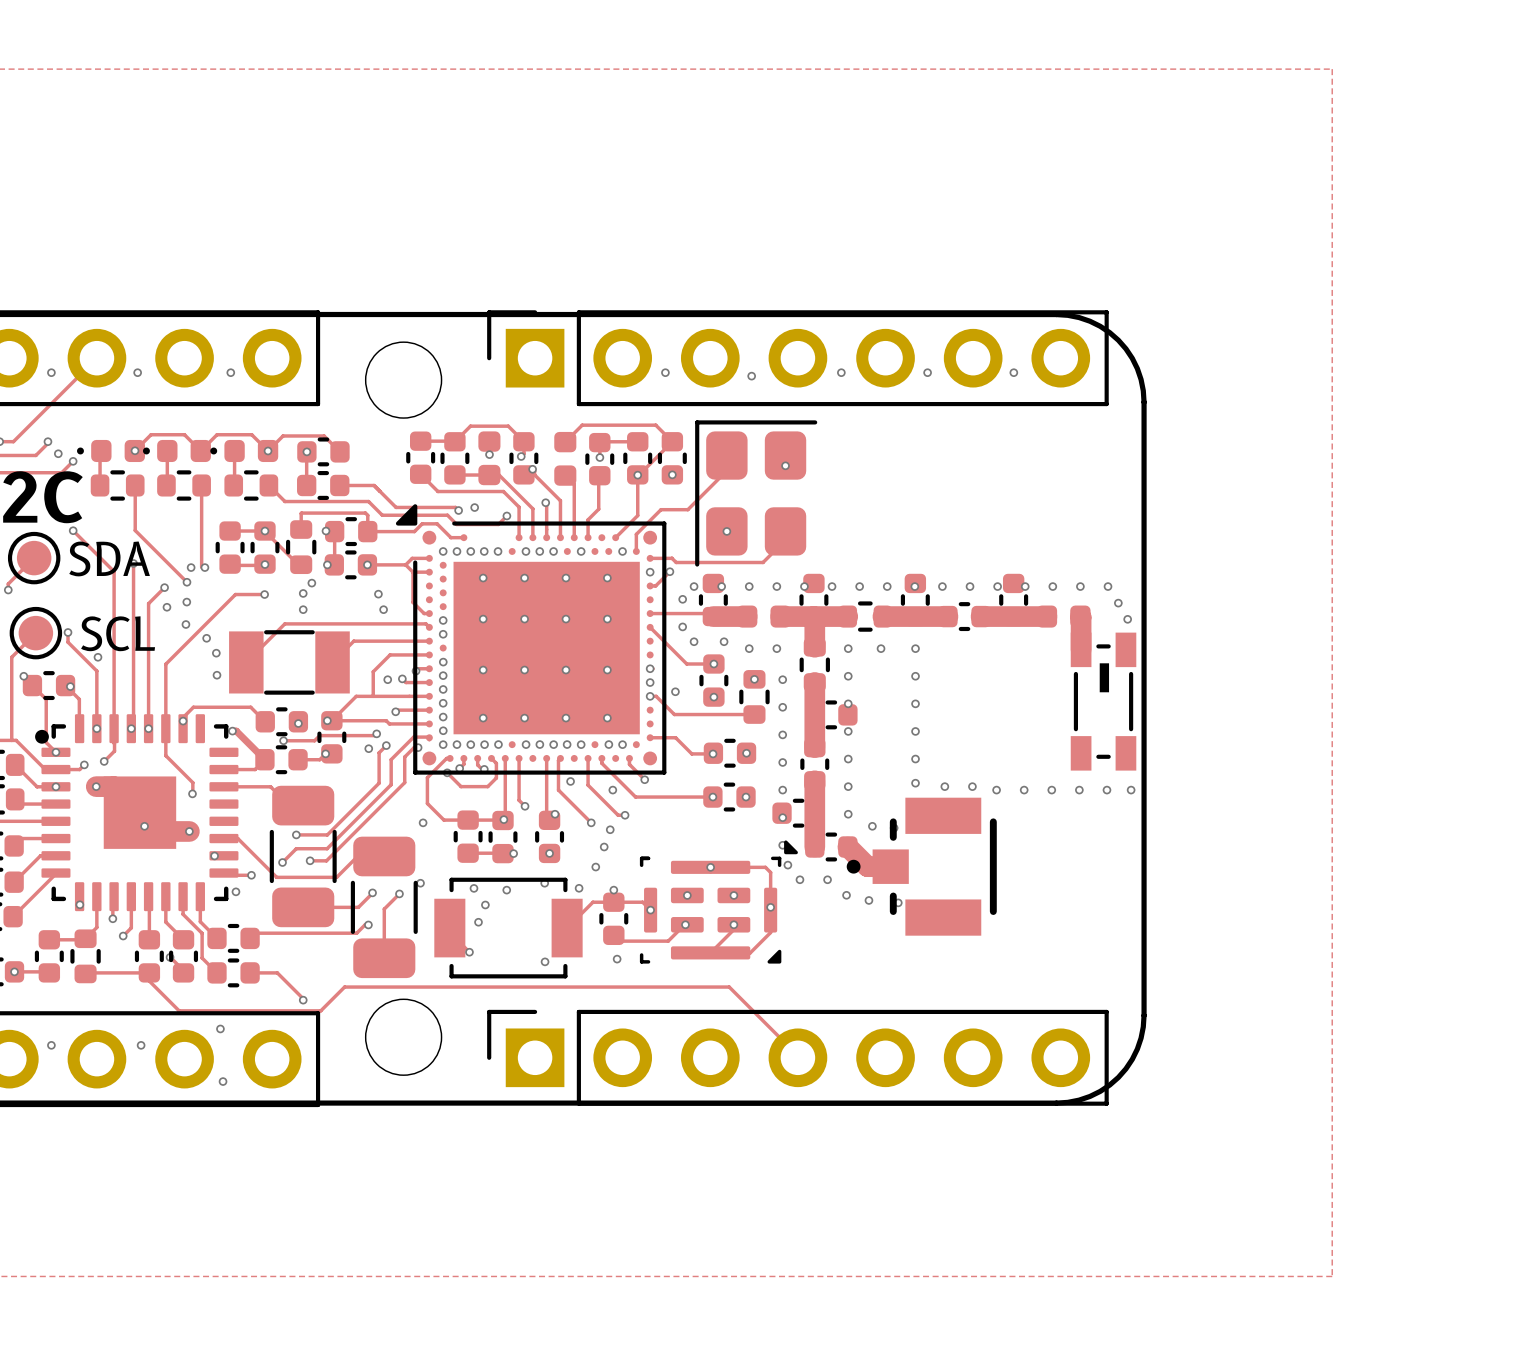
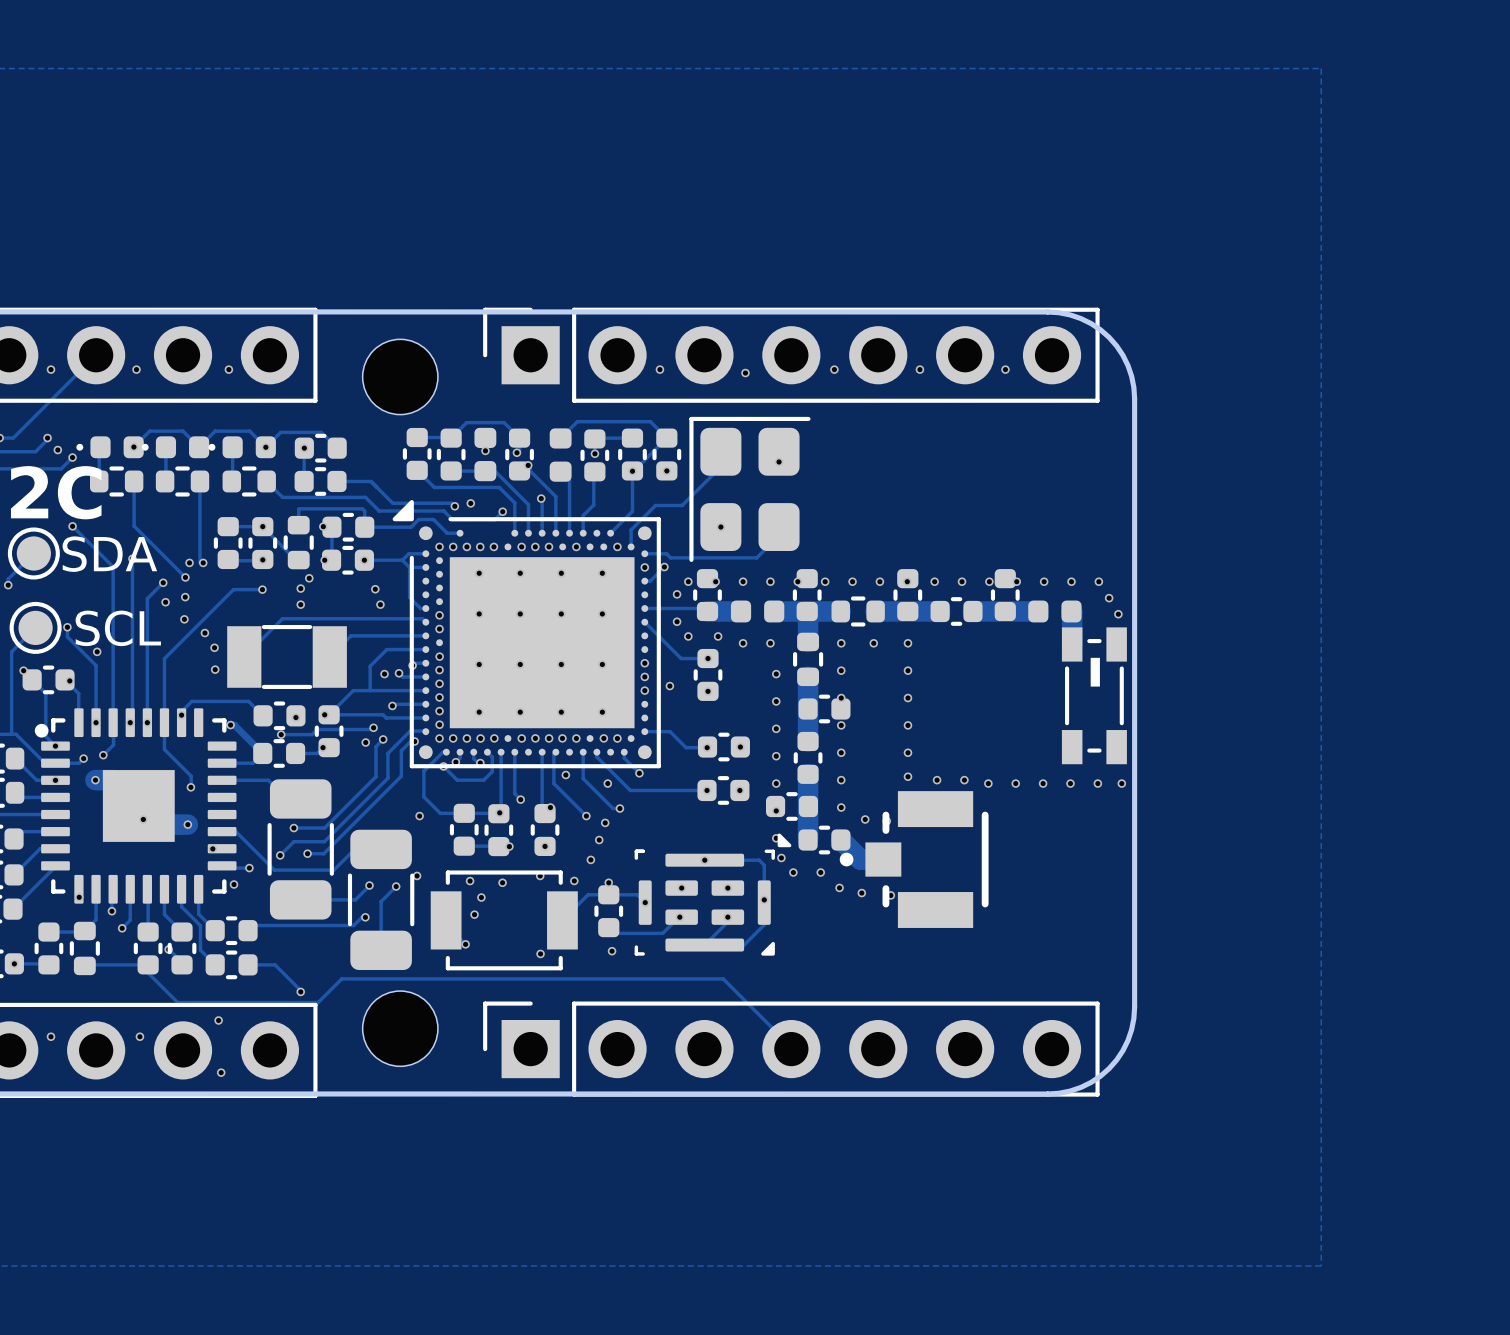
via: (754, 679) -> none
track: (650, 696) (656, 696) (674, 714) (754, 714) -> none
part: (754, 696) -> none

